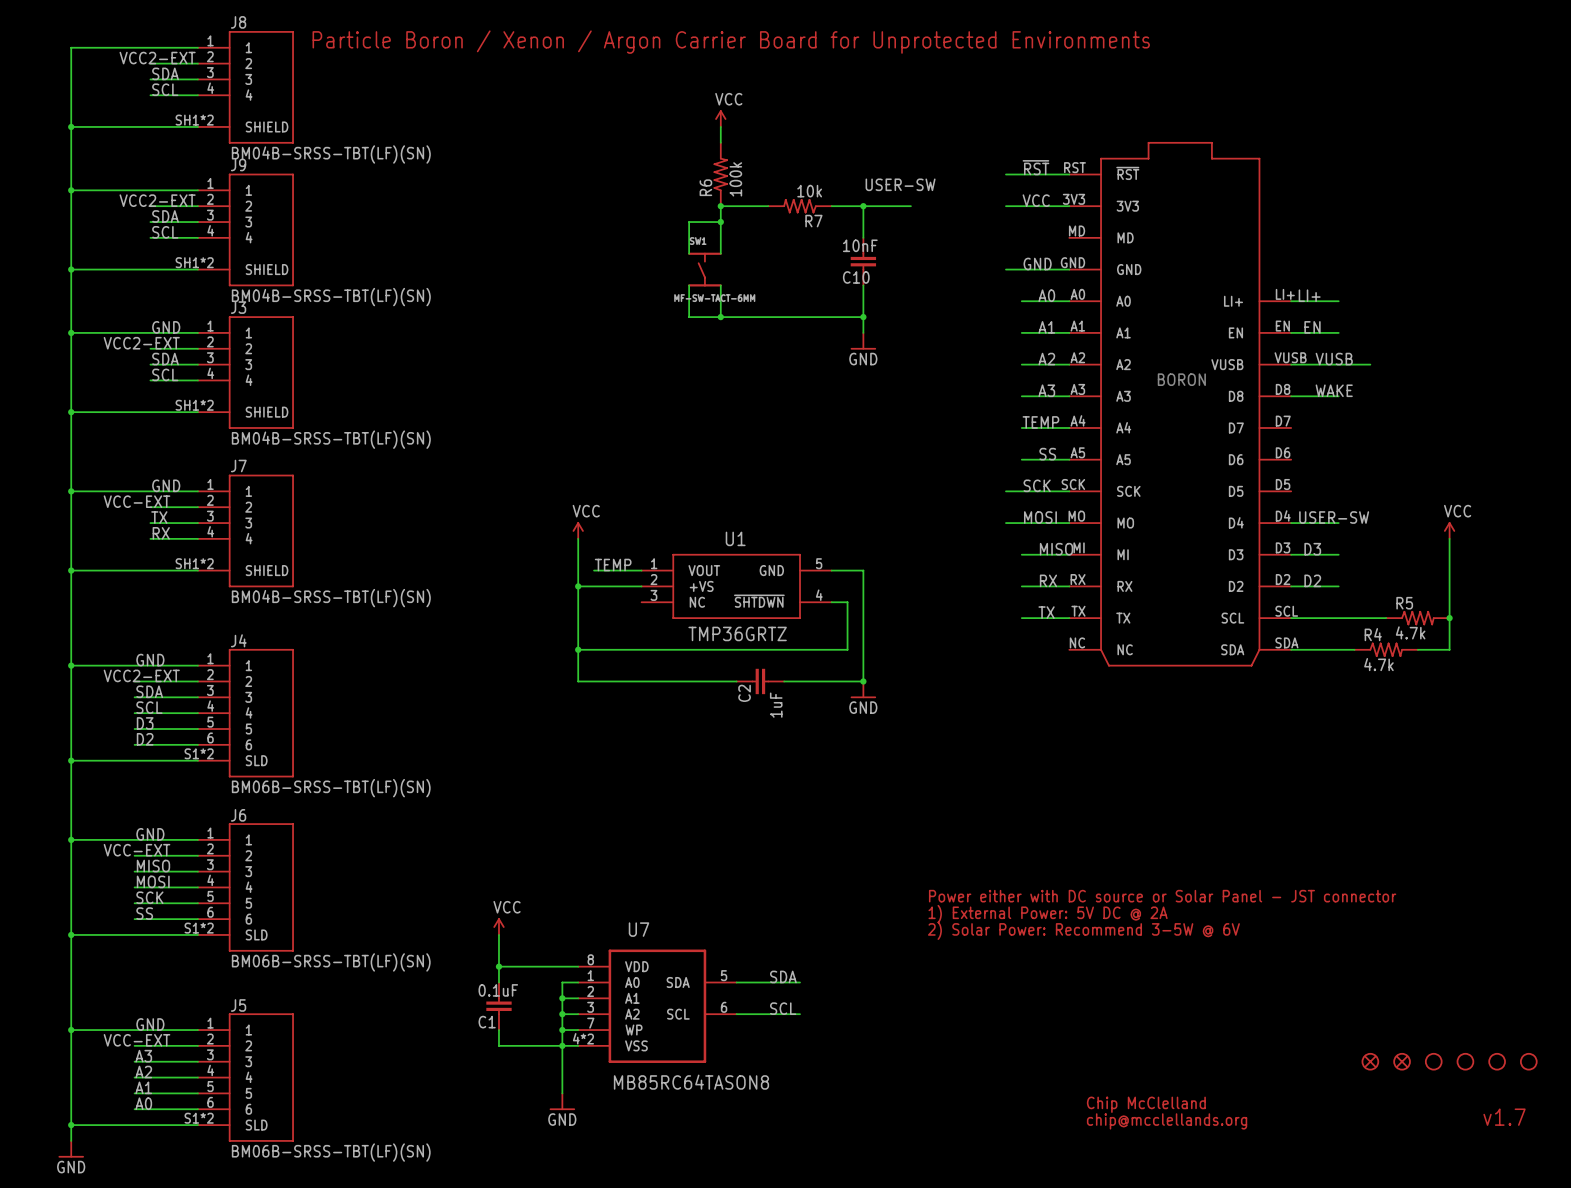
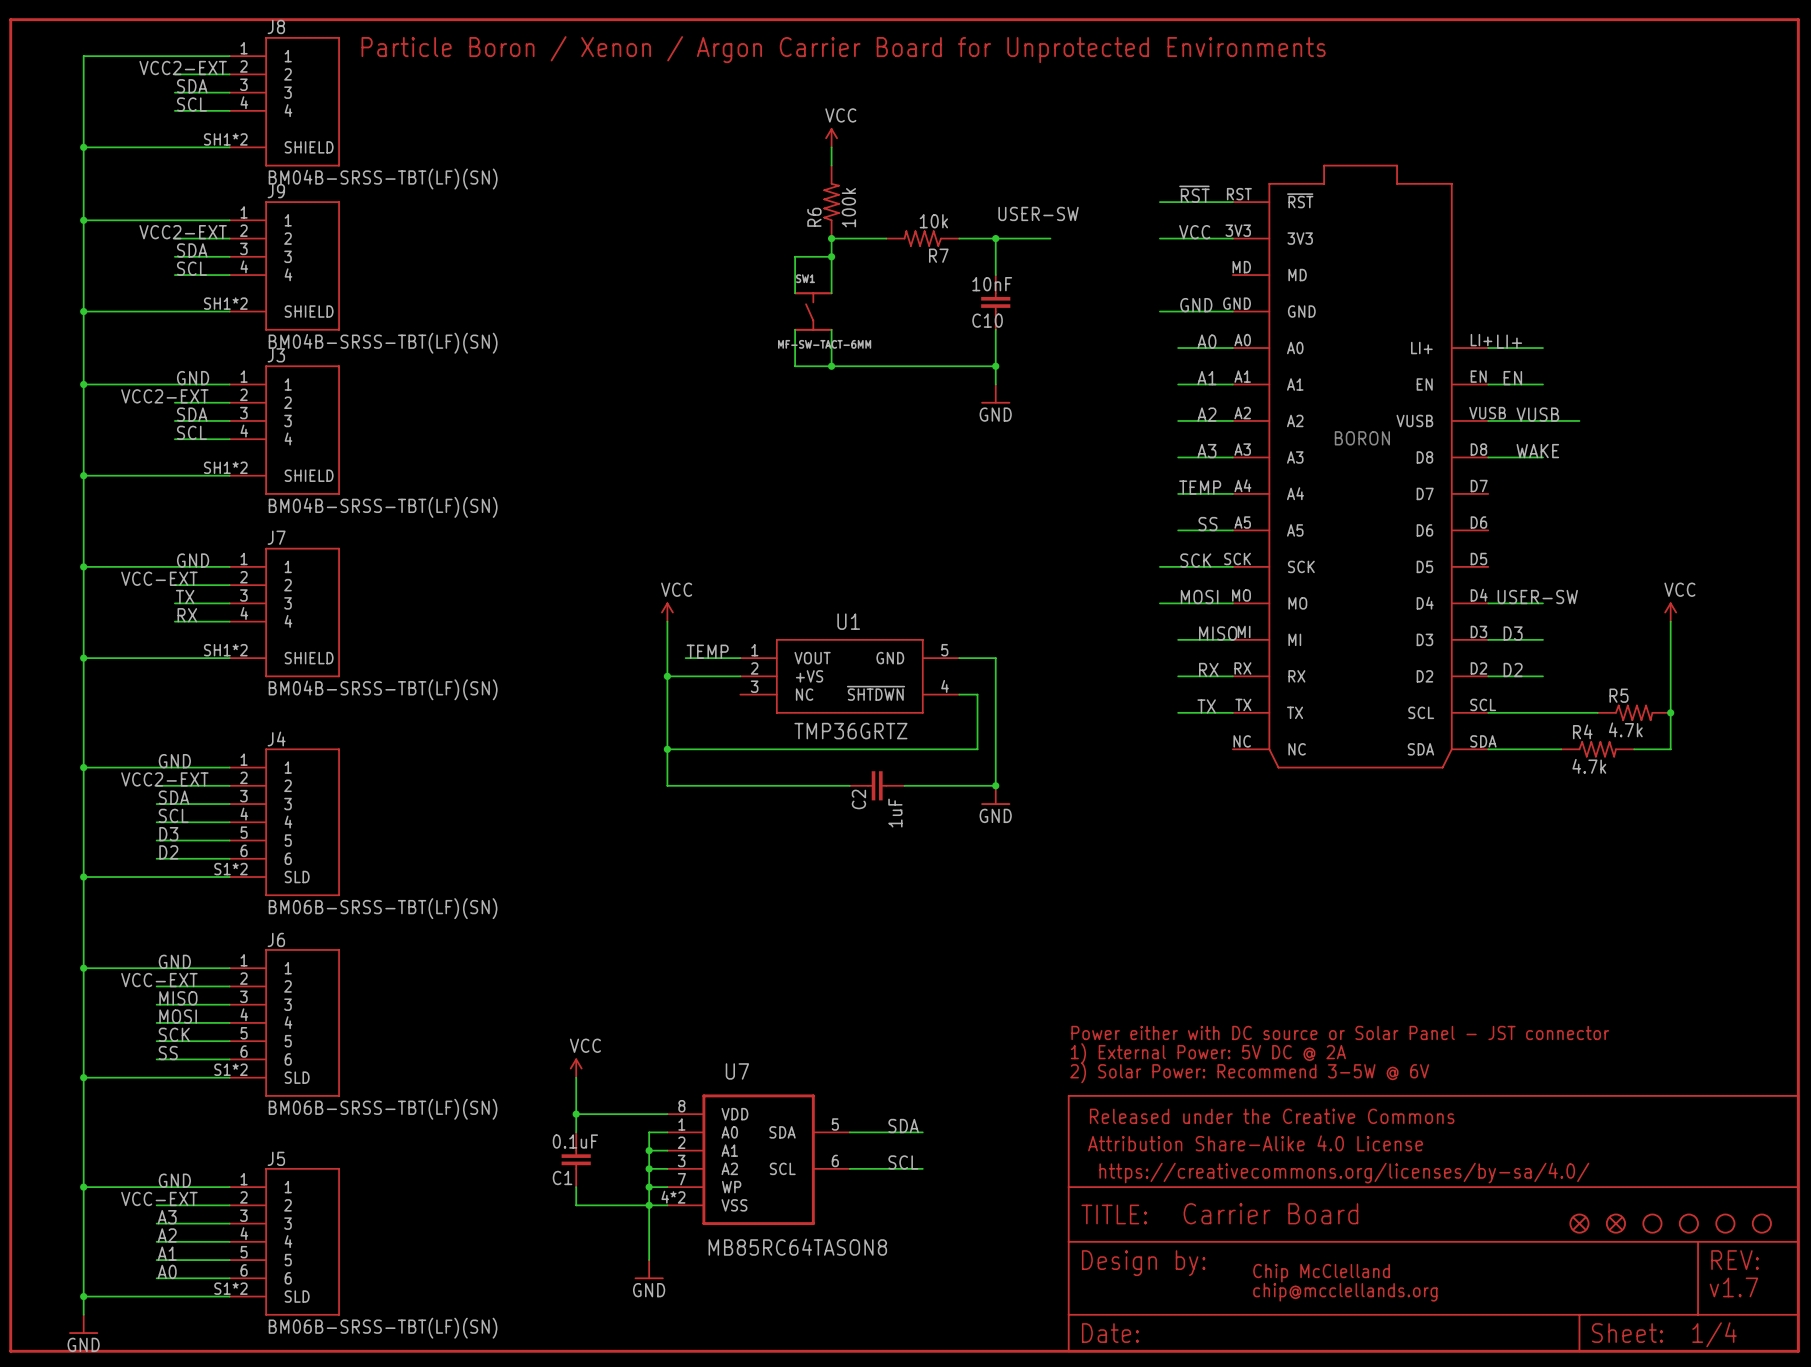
part: none -> (904, 685)
part: none -> (1433, 1223)

